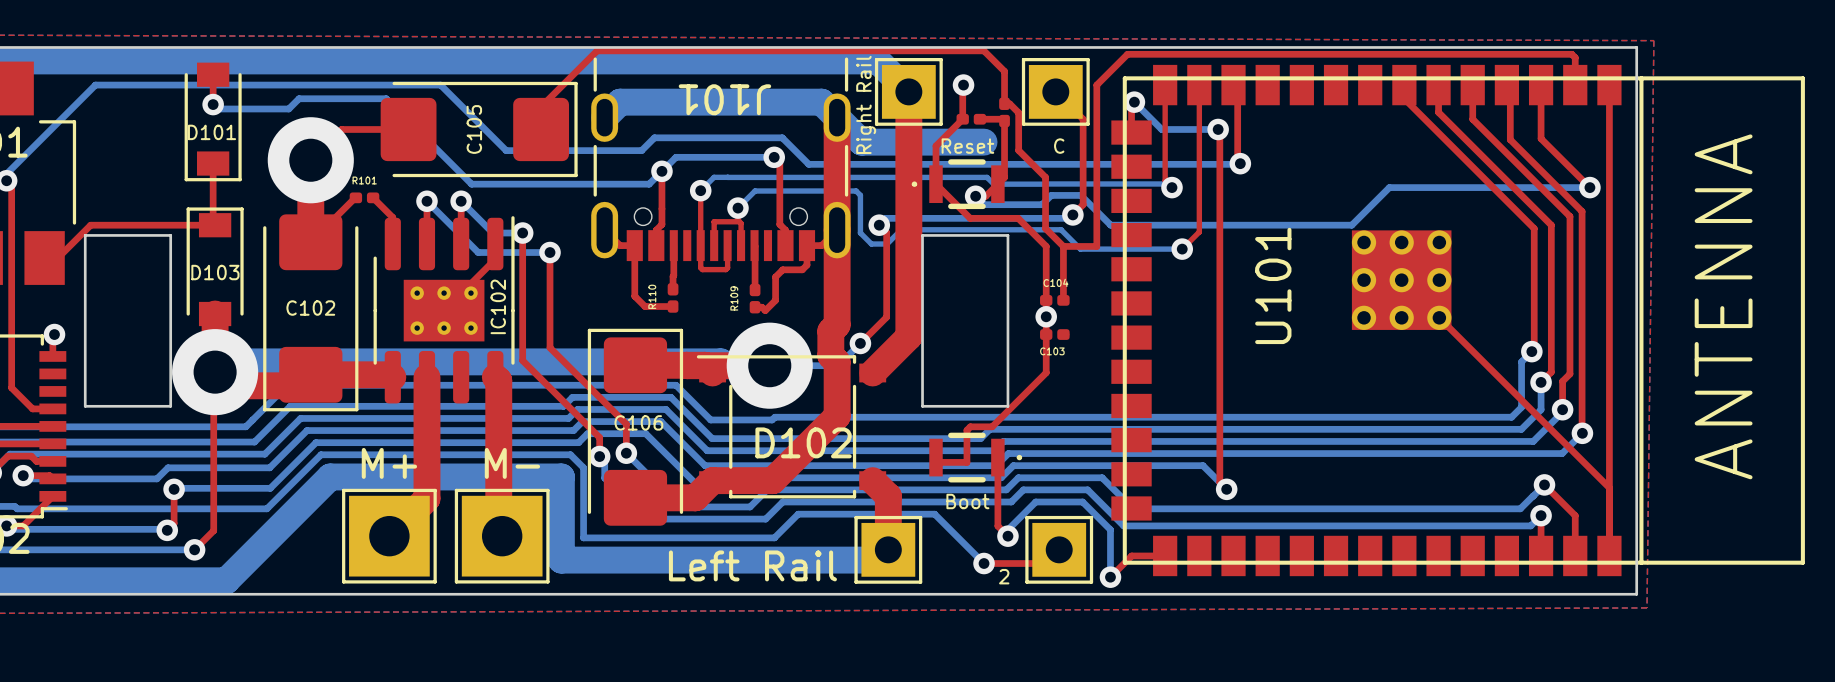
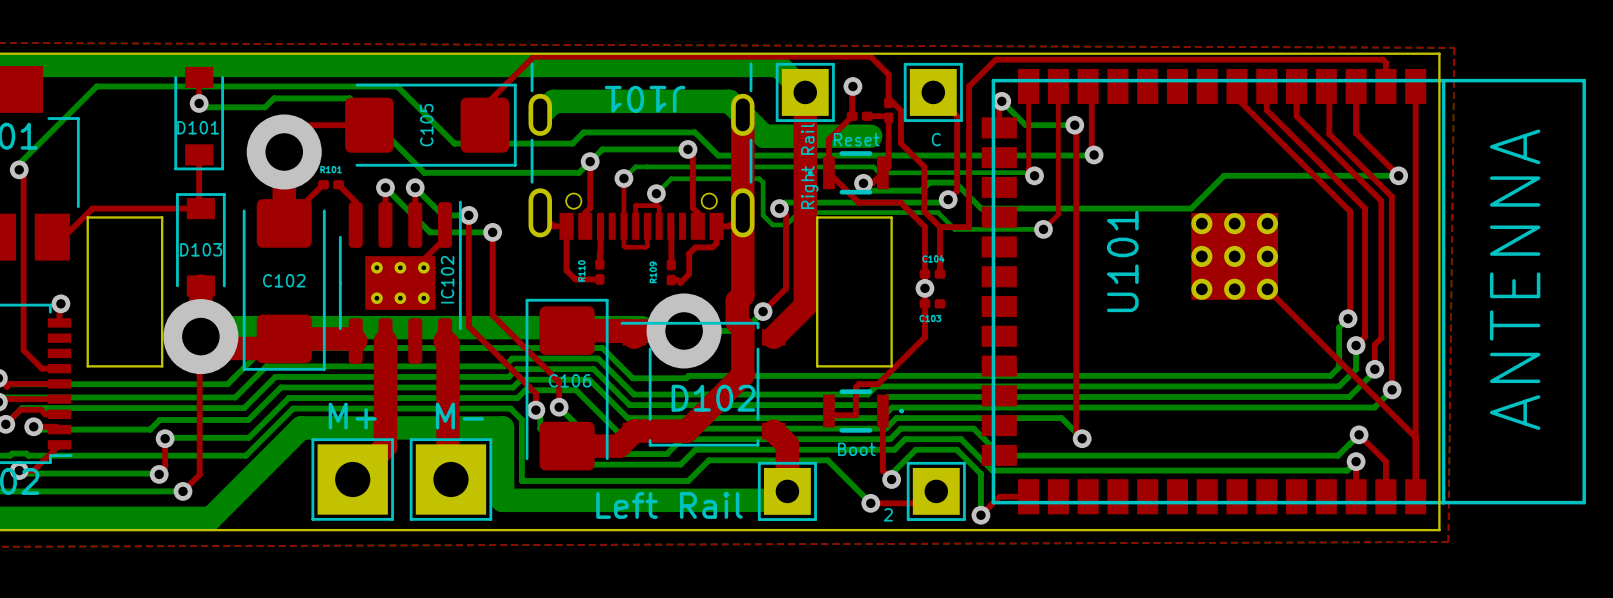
part value position: Right Rail (866, 104) -> Right Rail (809, 166)

